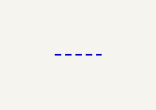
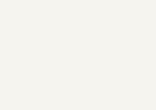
line: (54, 54) (101, 54) -> none

